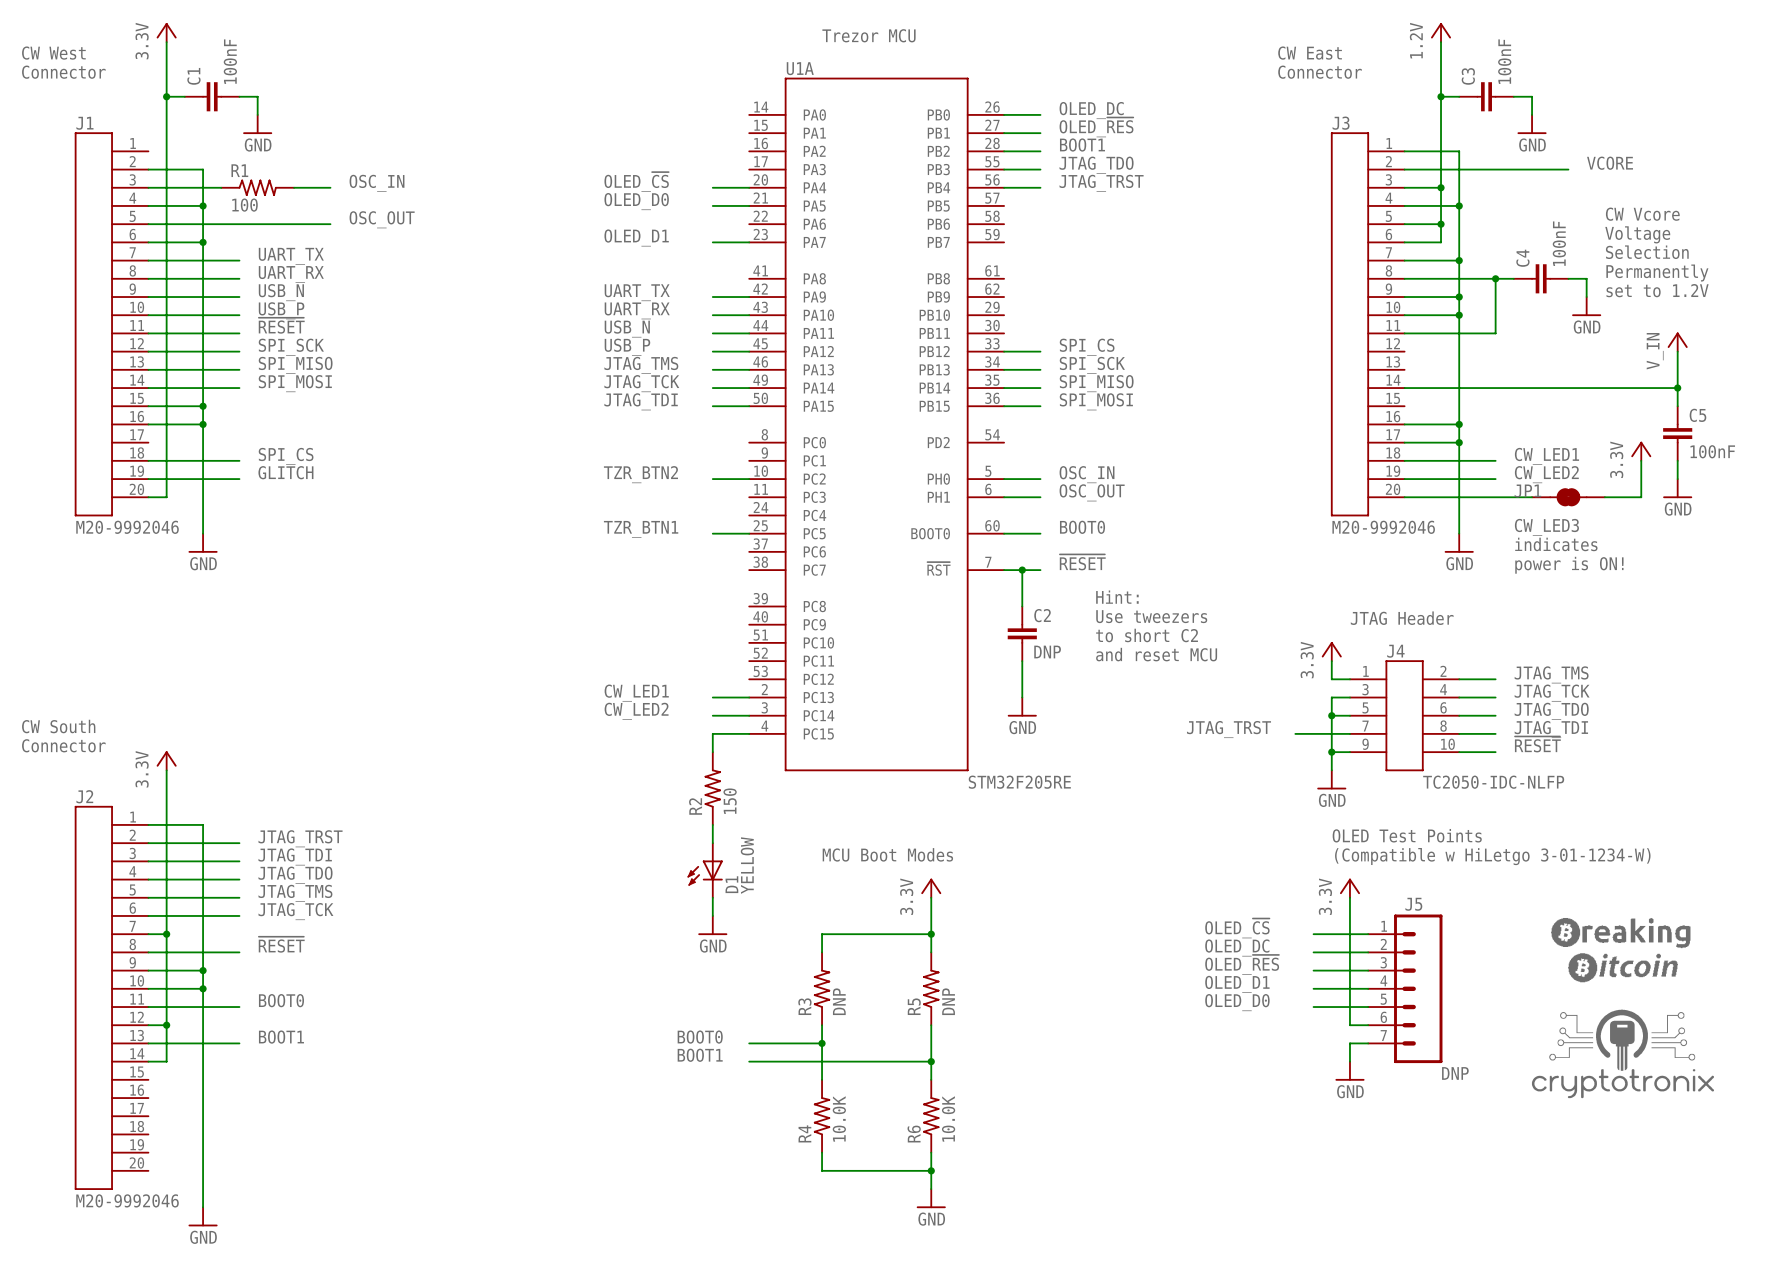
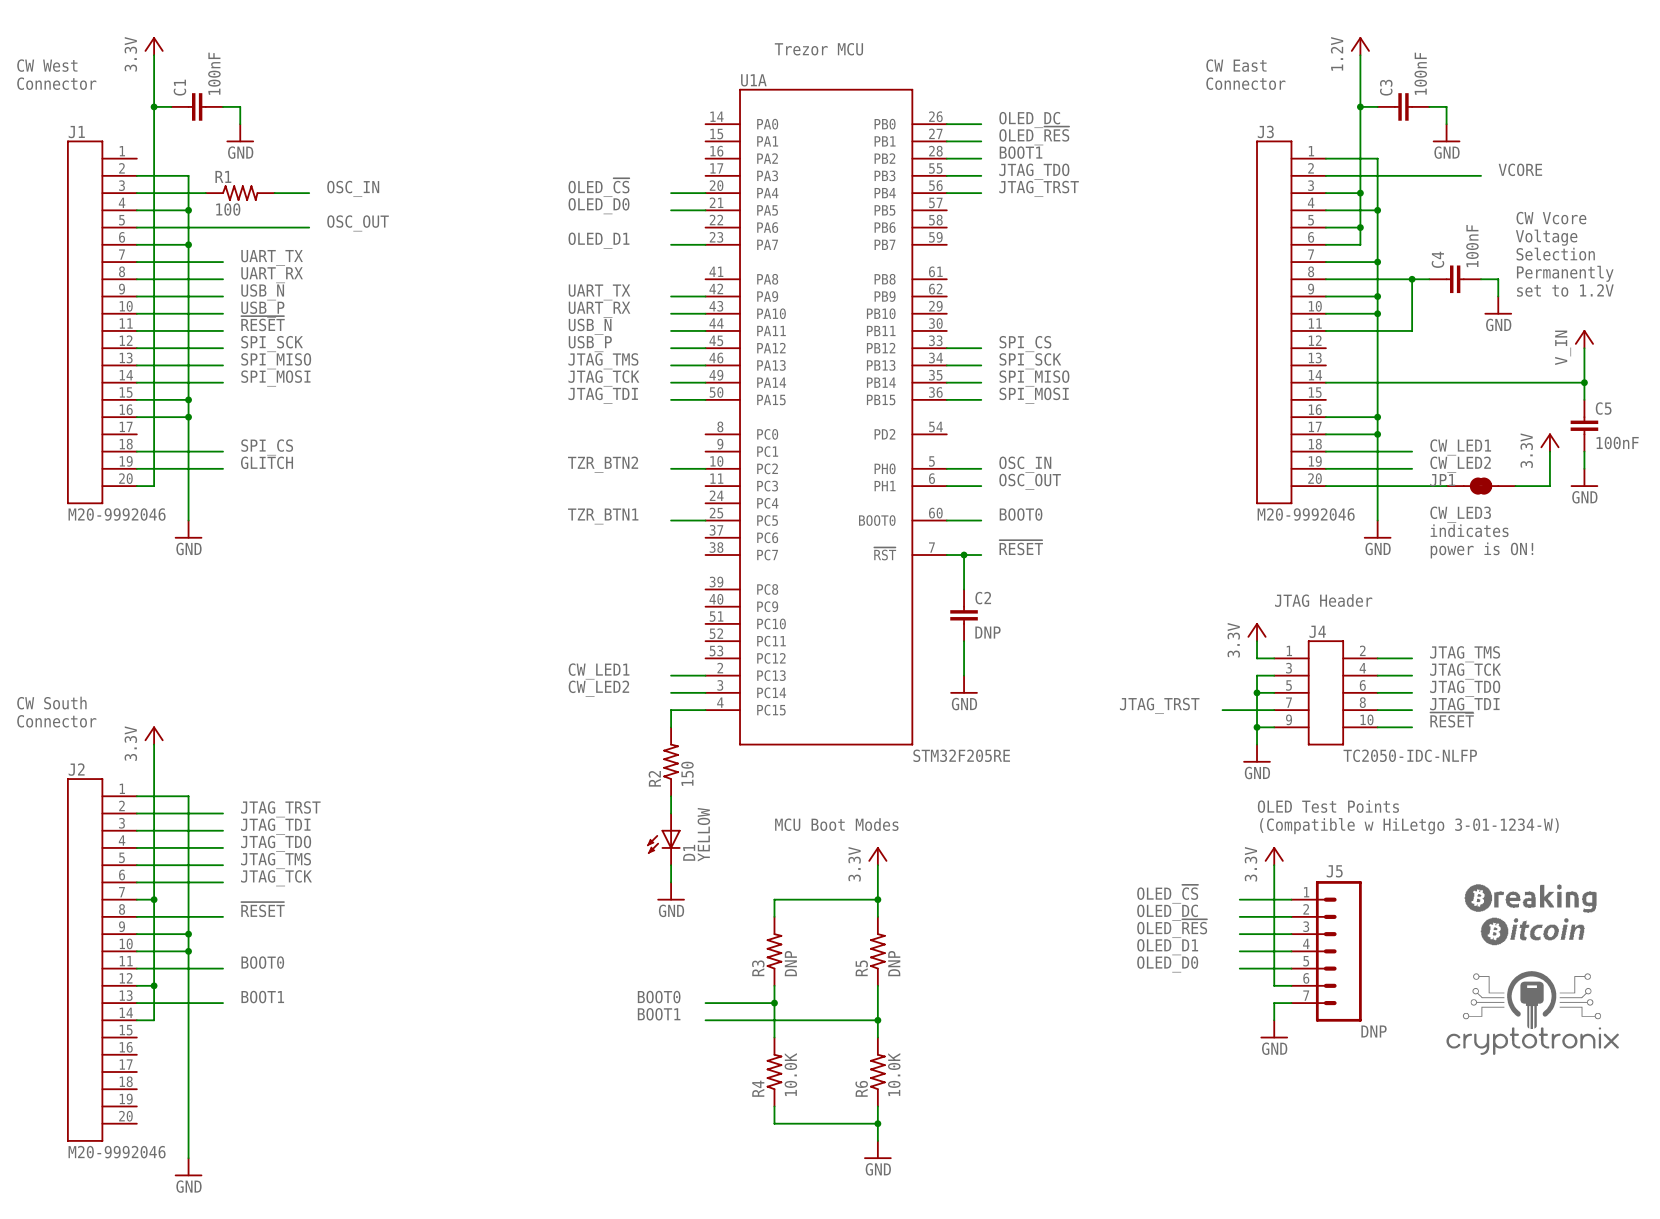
text: Hint: (1117, 597) -> none
text: Use tweezers (1151, 616) -> none
text: to short C2 (1147, 635) -> none
text: and reset MCU (1156, 654) -> none

